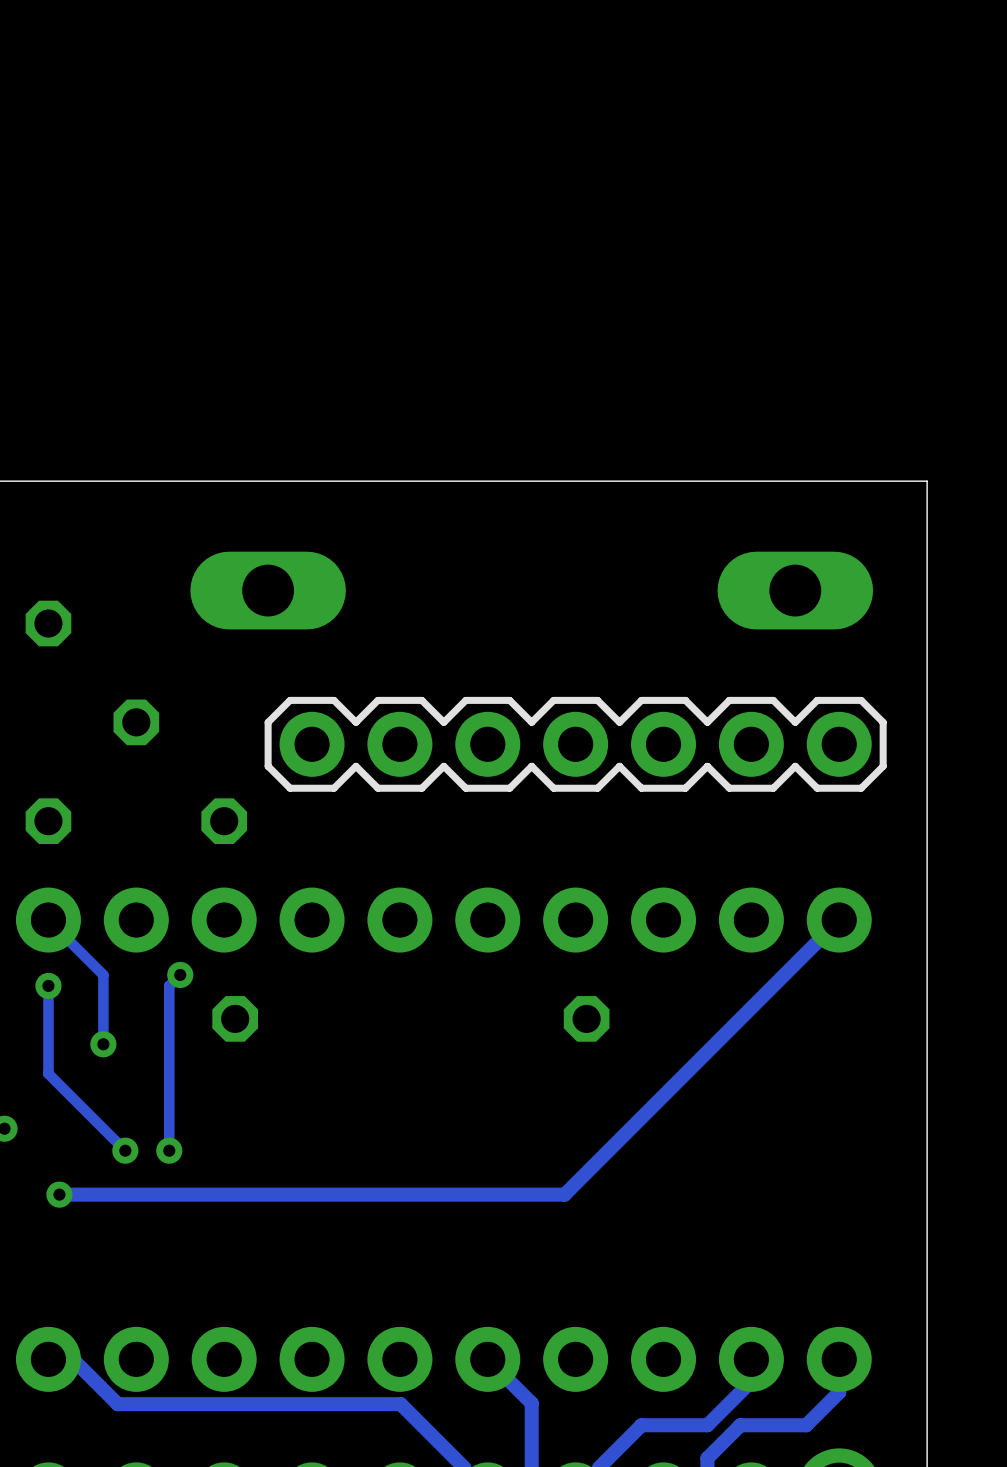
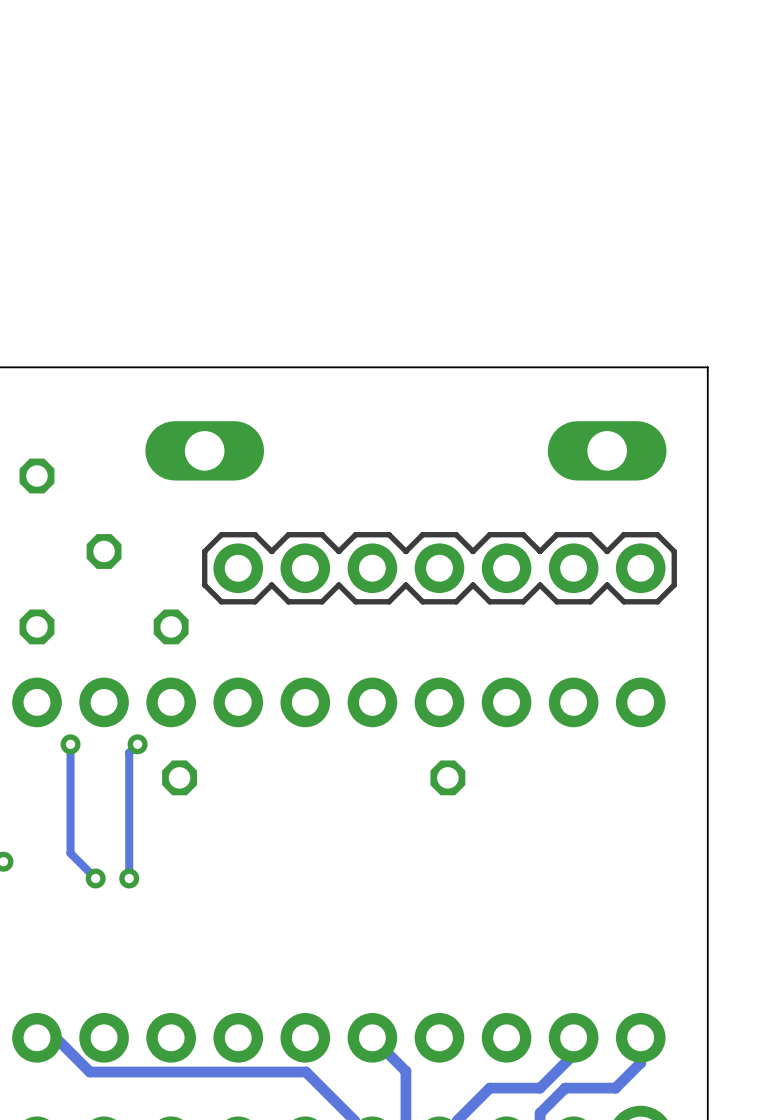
track: (48, 920) (103, 974) (103, 1044) -> none
track: (839, 920) (564, 1194) (59, 1194) -> none
via: none -> (70, 744)
track: (48, 985) (48, 1073) (92, 1117) -> (70, 744) (70, 853)
via: (48, 985) -> none
via: (103, 1044) -> none
via: (59, 1194) -> none

